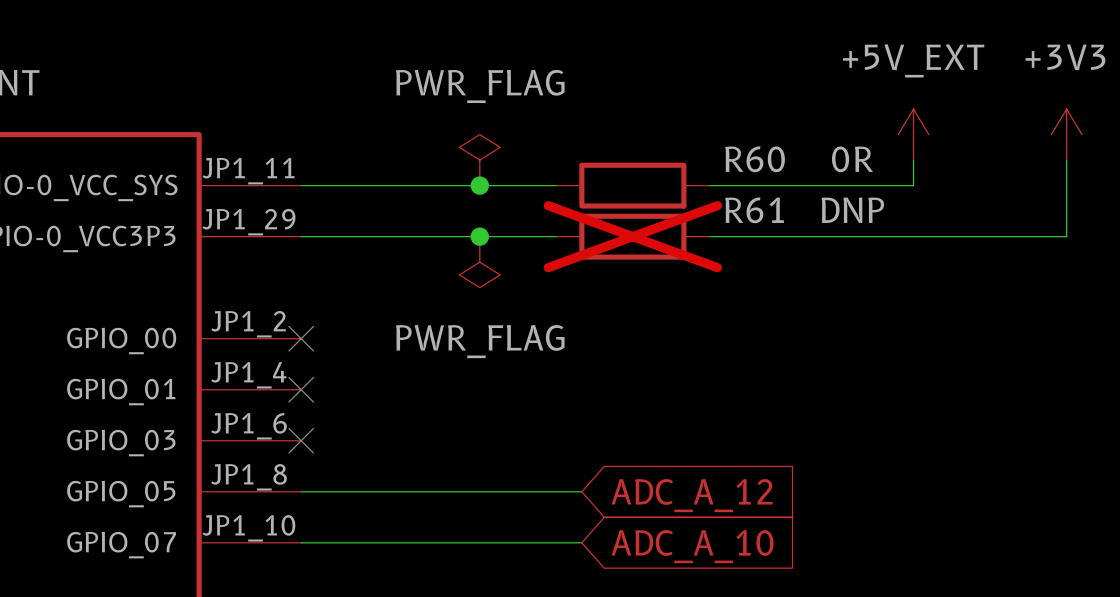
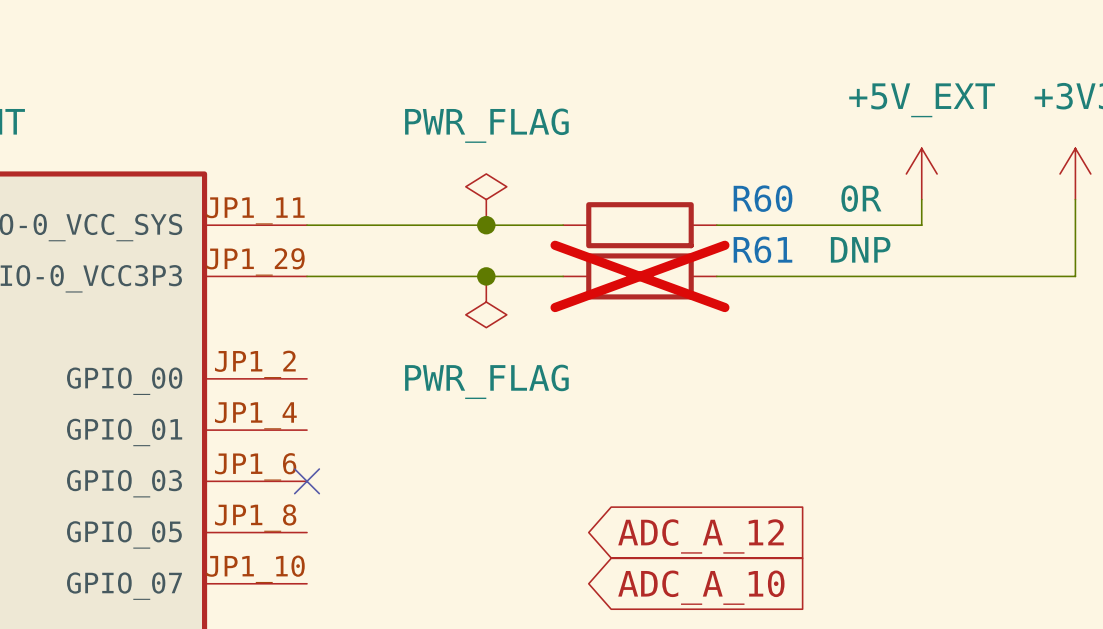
no-connect mark: (301, 338) -> none
no-connect mark: (301, 389) -> none
wire: (301, 491) (581, 491) -> none
wire: (301, 542) (581, 542) -> none

